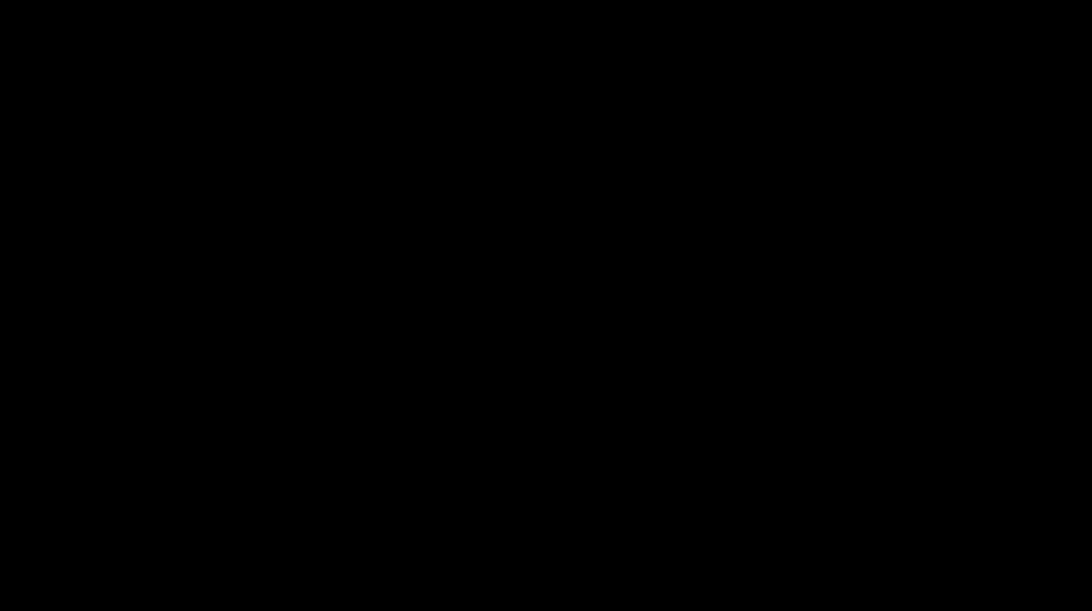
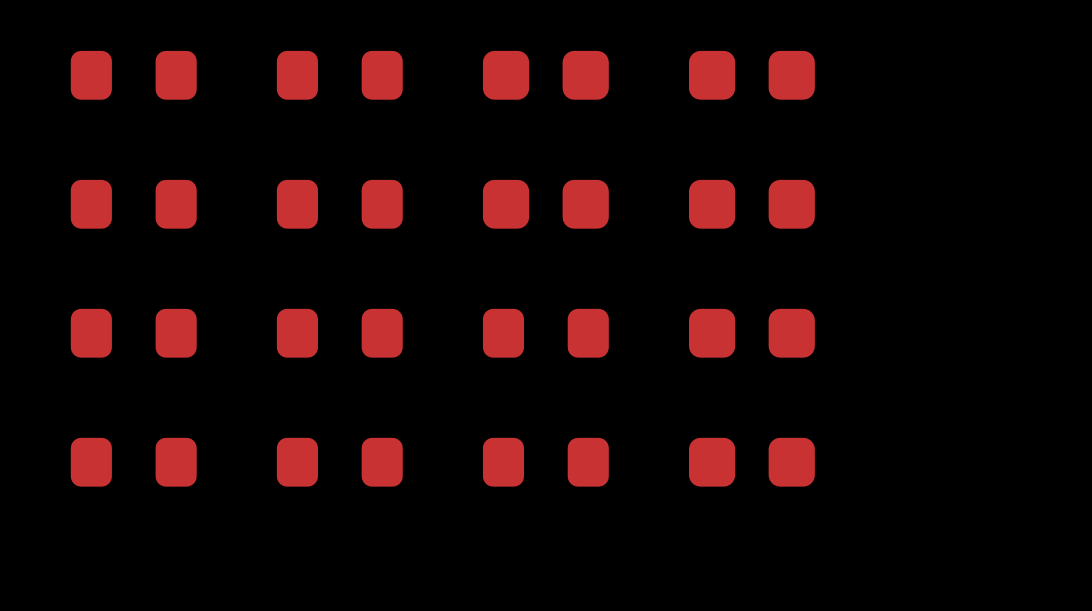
part: none -> (133, 75)
part: none -> (339, 75)
part: none -> (545, 75)
part: none -> (751, 75)
part: none -> (133, 204)
part: none -> (339, 204)
part: none -> (545, 204)
part: none -> (751, 204)
part: none -> (133, 333)
part: none -> (339, 333)
part: none -> (545, 333)
part: none -> (751, 333)
part: none -> (133, 462)
part: none -> (339, 462)
part: none -> (545, 462)
part: none -> (751, 462)

